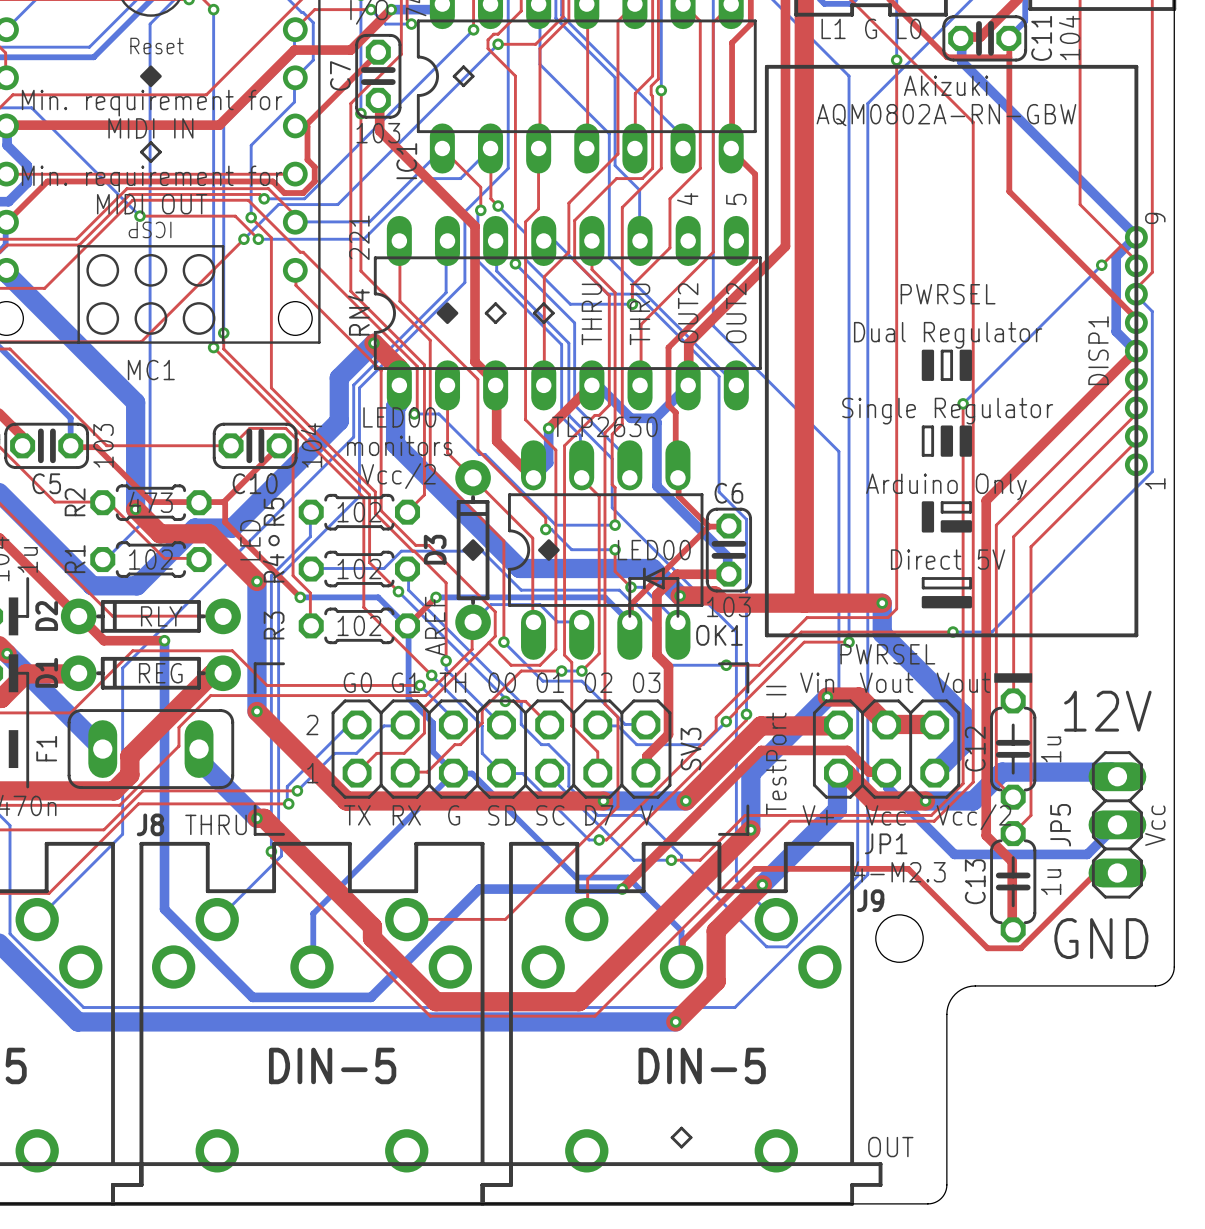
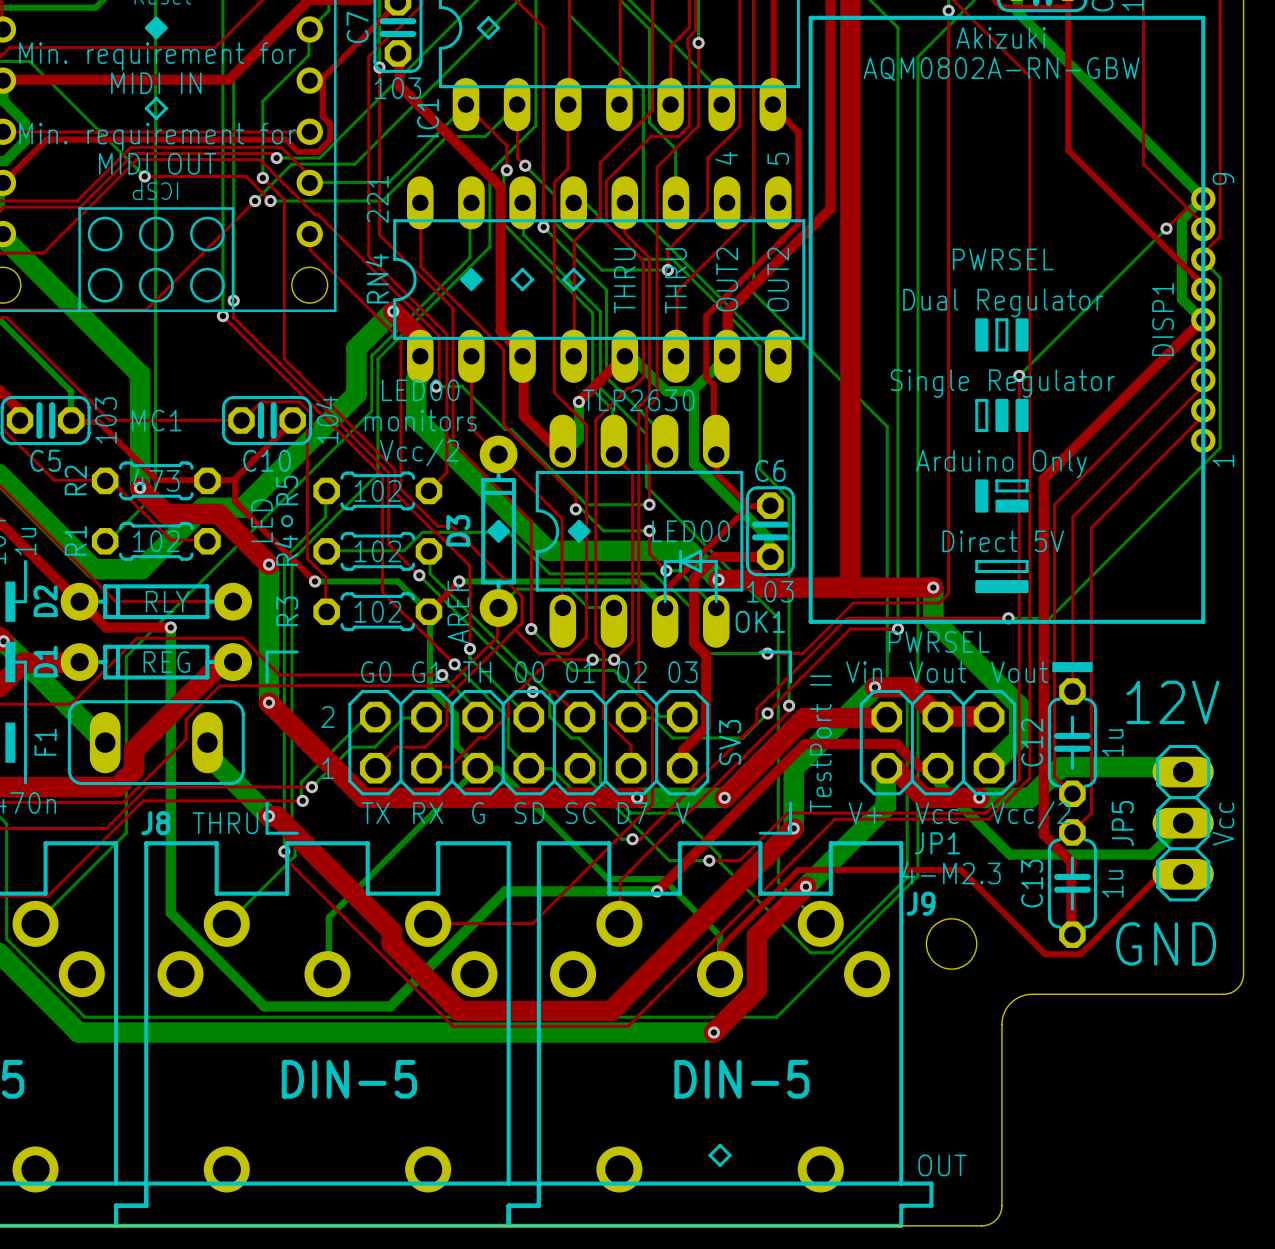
text position: MC1 (151, 370) -> MC1 (156, 420)

